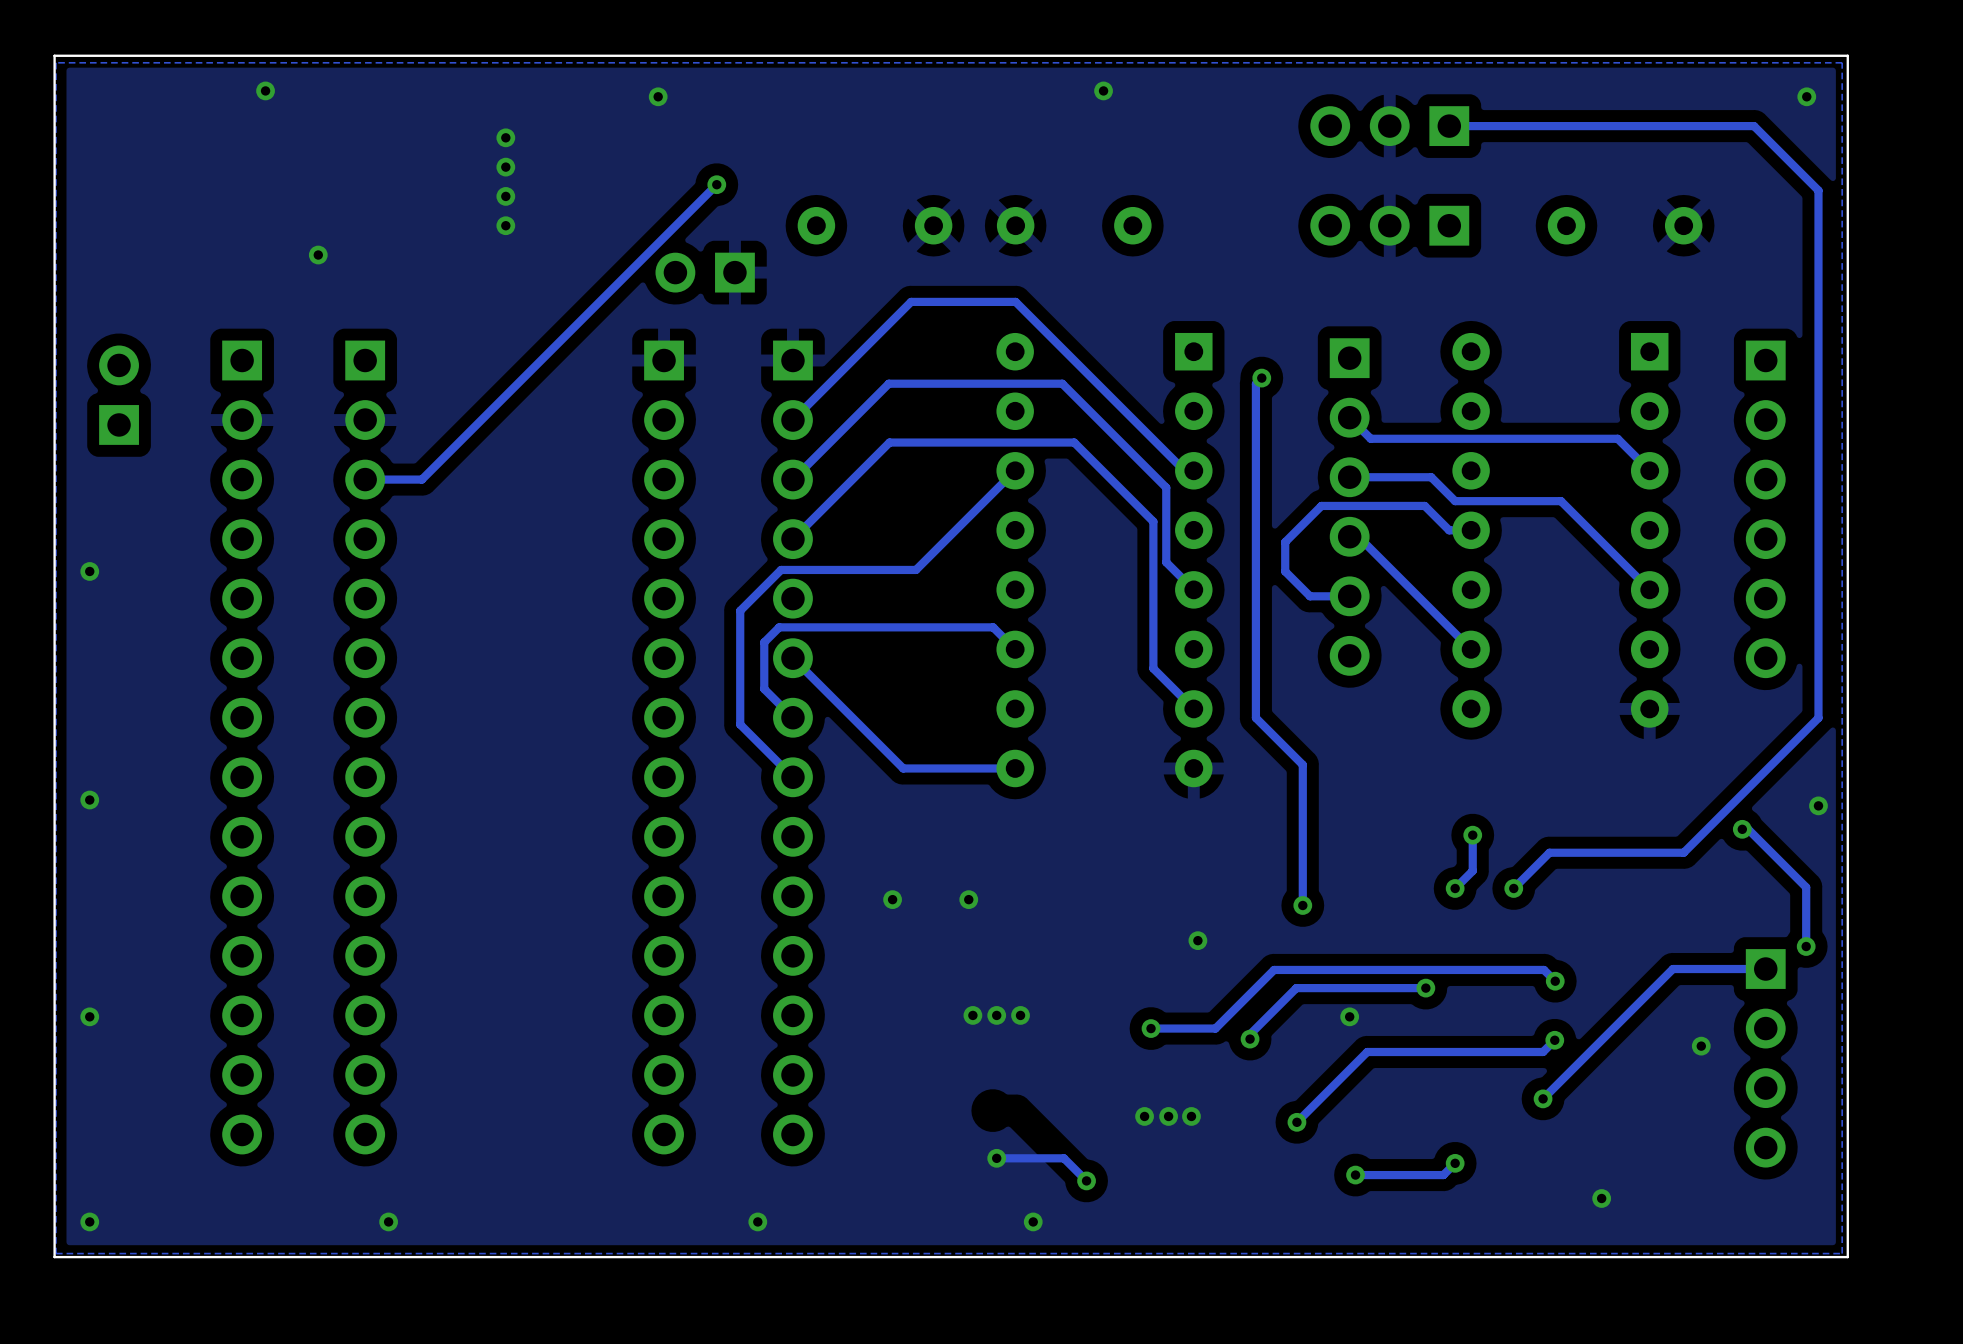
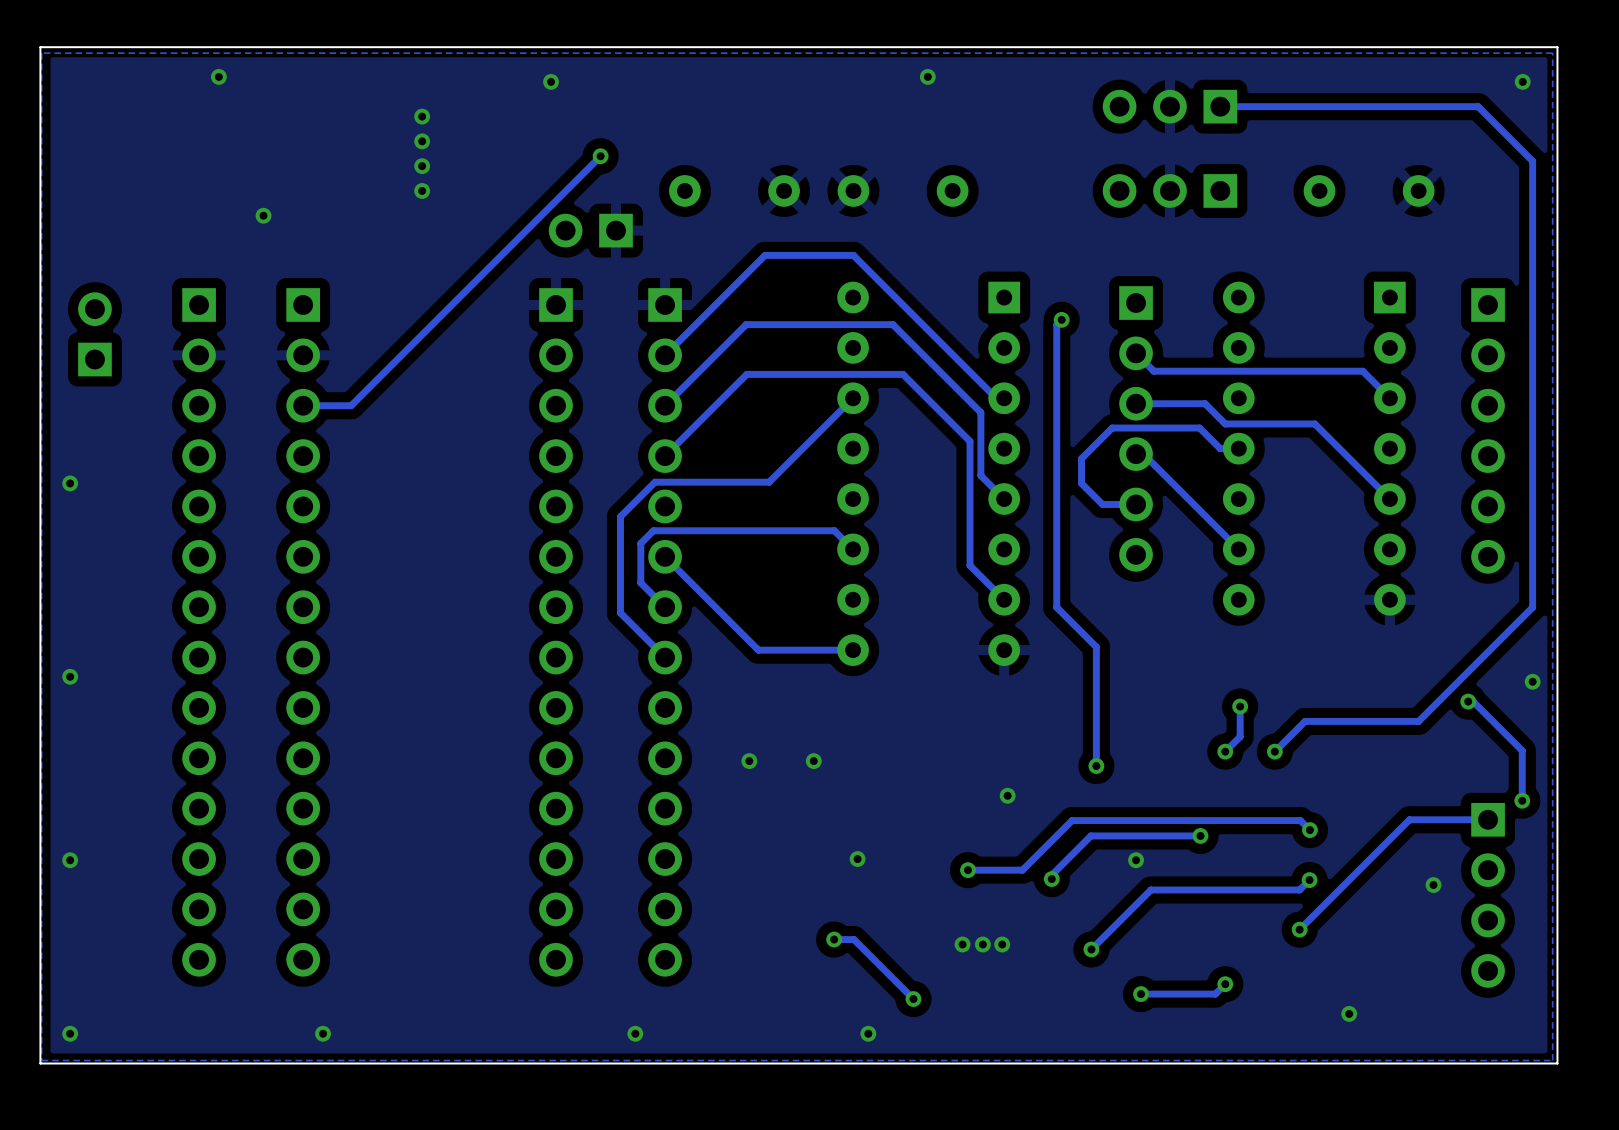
via: (972, 1015) -> none
via: (996, 1015) -> none
via: none -> (834, 939)
via: (996, 1158) -> none
track: (1063, 1158) (996, 1158) -> (894, 979) (853, 939) (834, 939)

